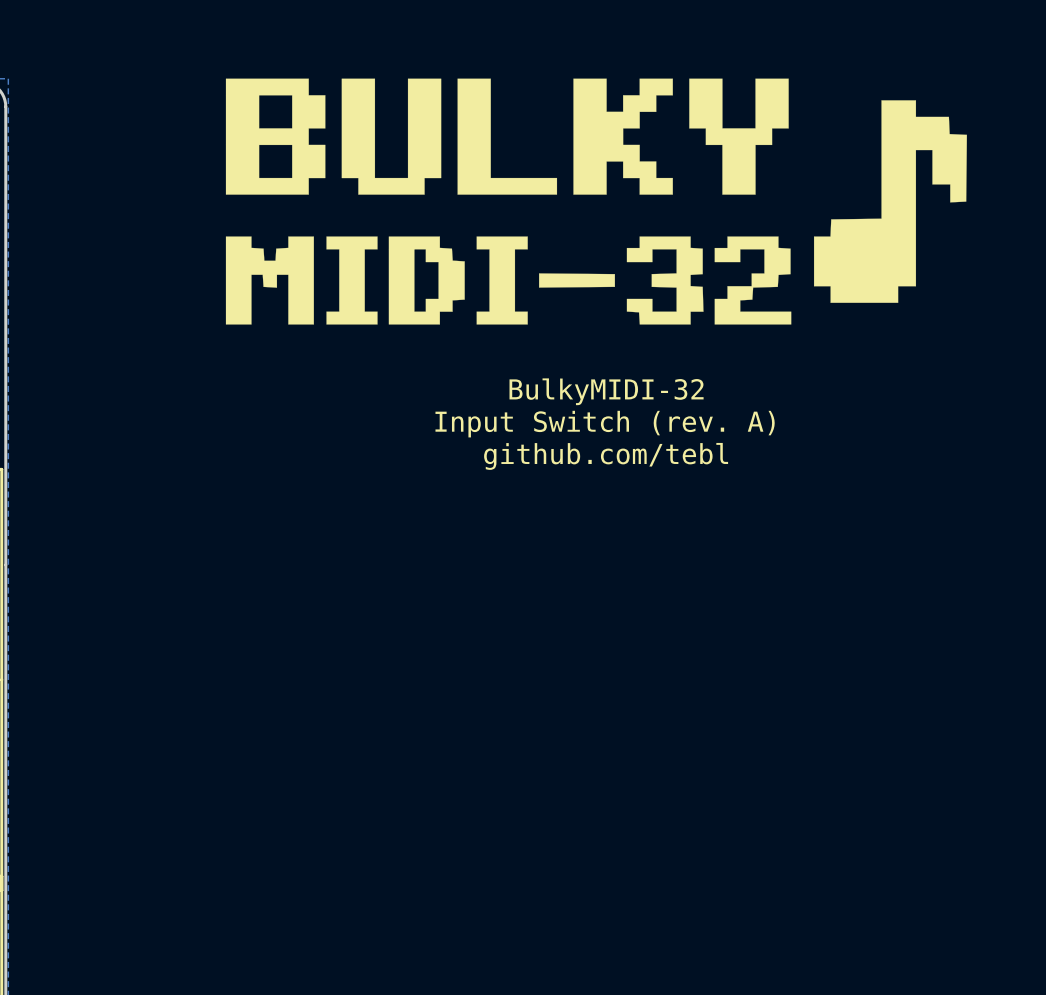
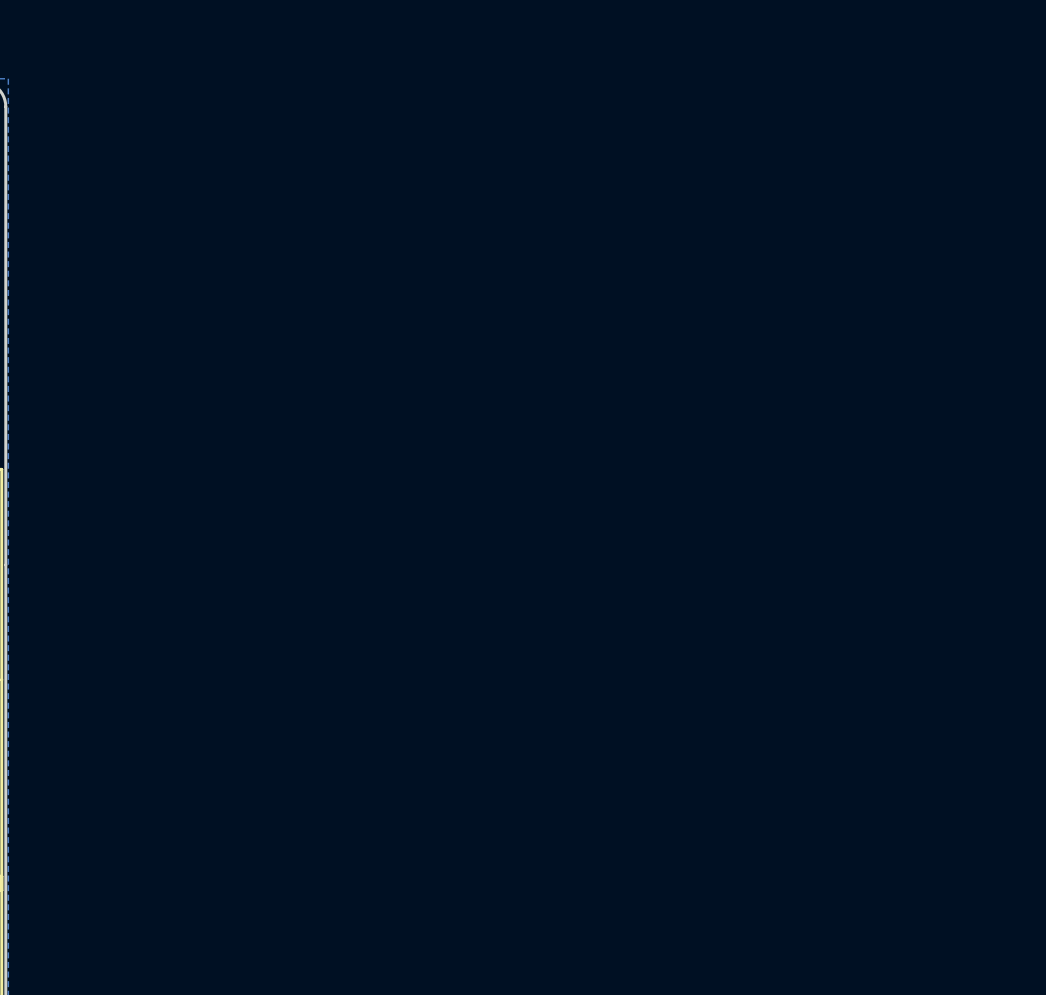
drawing: [225, 78, 967, 325] -> none
text: BulkyMIDI-32 (606, 391) -> none
text: Input Switch (rev. A) (605, 424) -> none
text: github.com/tebl (606, 456) -> none

